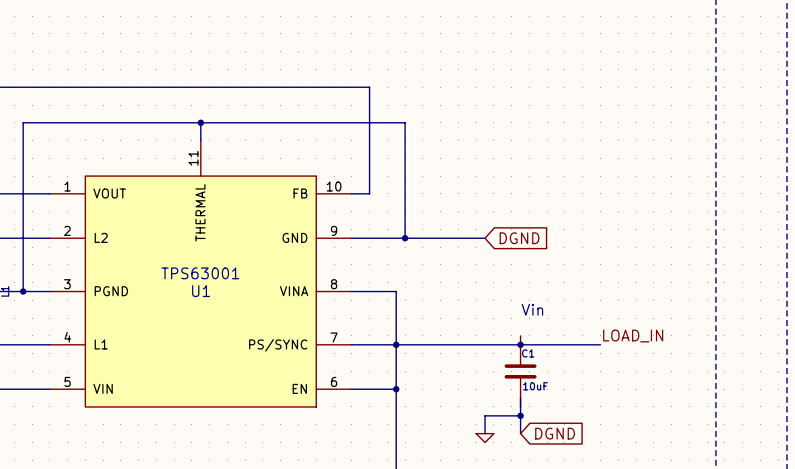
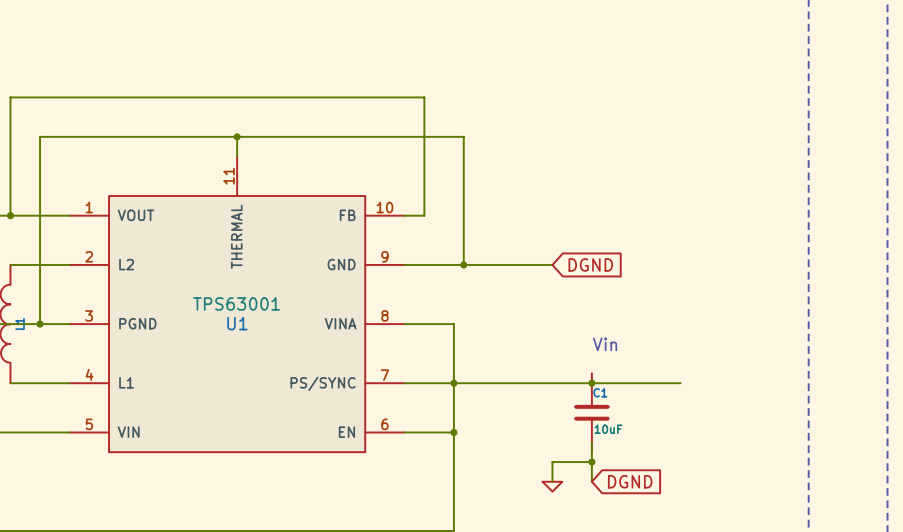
label: LOAD_IN (633, 336) -> none

